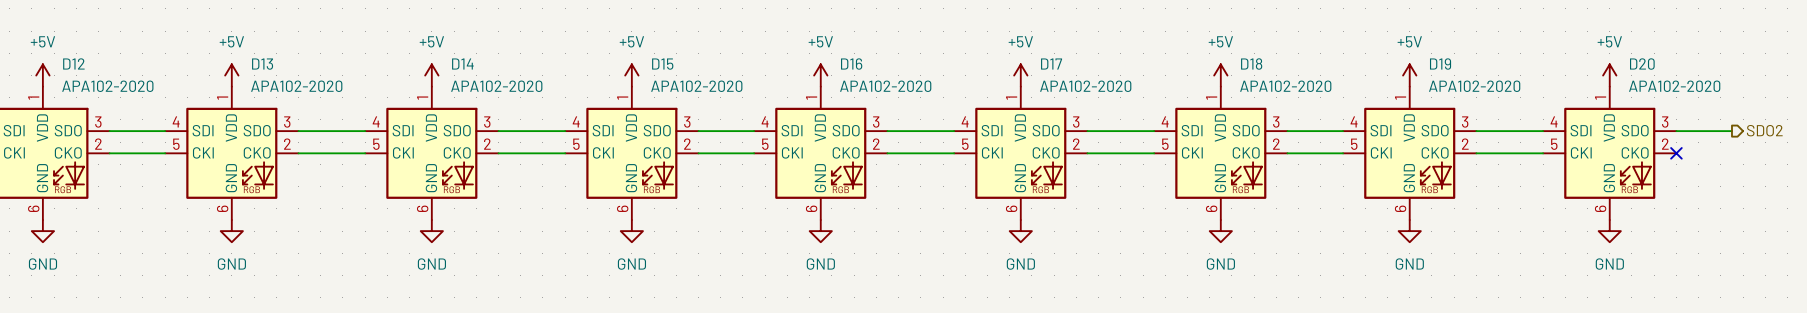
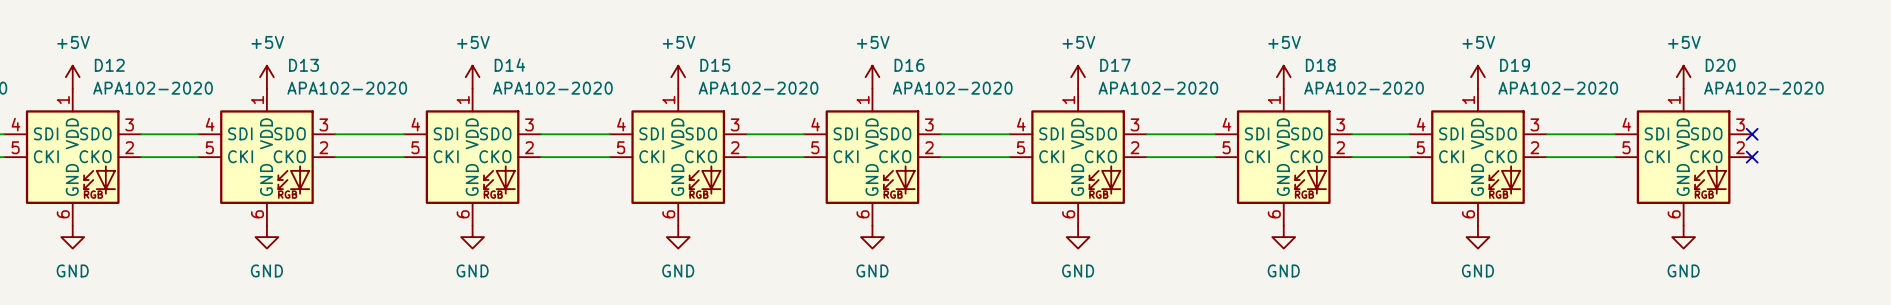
hierarchical label: SDO2 (1764, 130) -> none
wire: (1676, 131) (1731, 131) -> none
no-connect mark: none -> (1752, 134)

